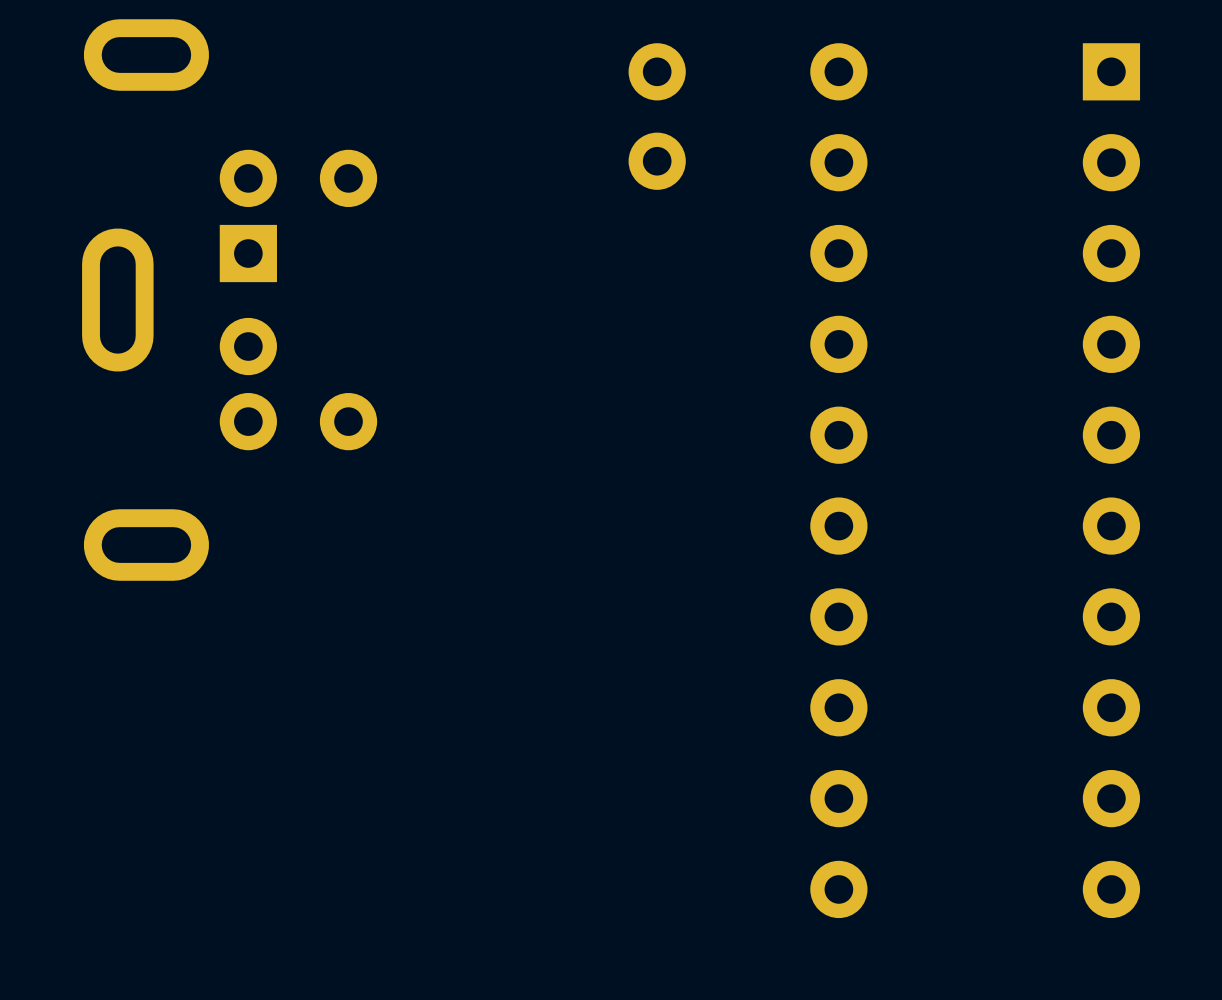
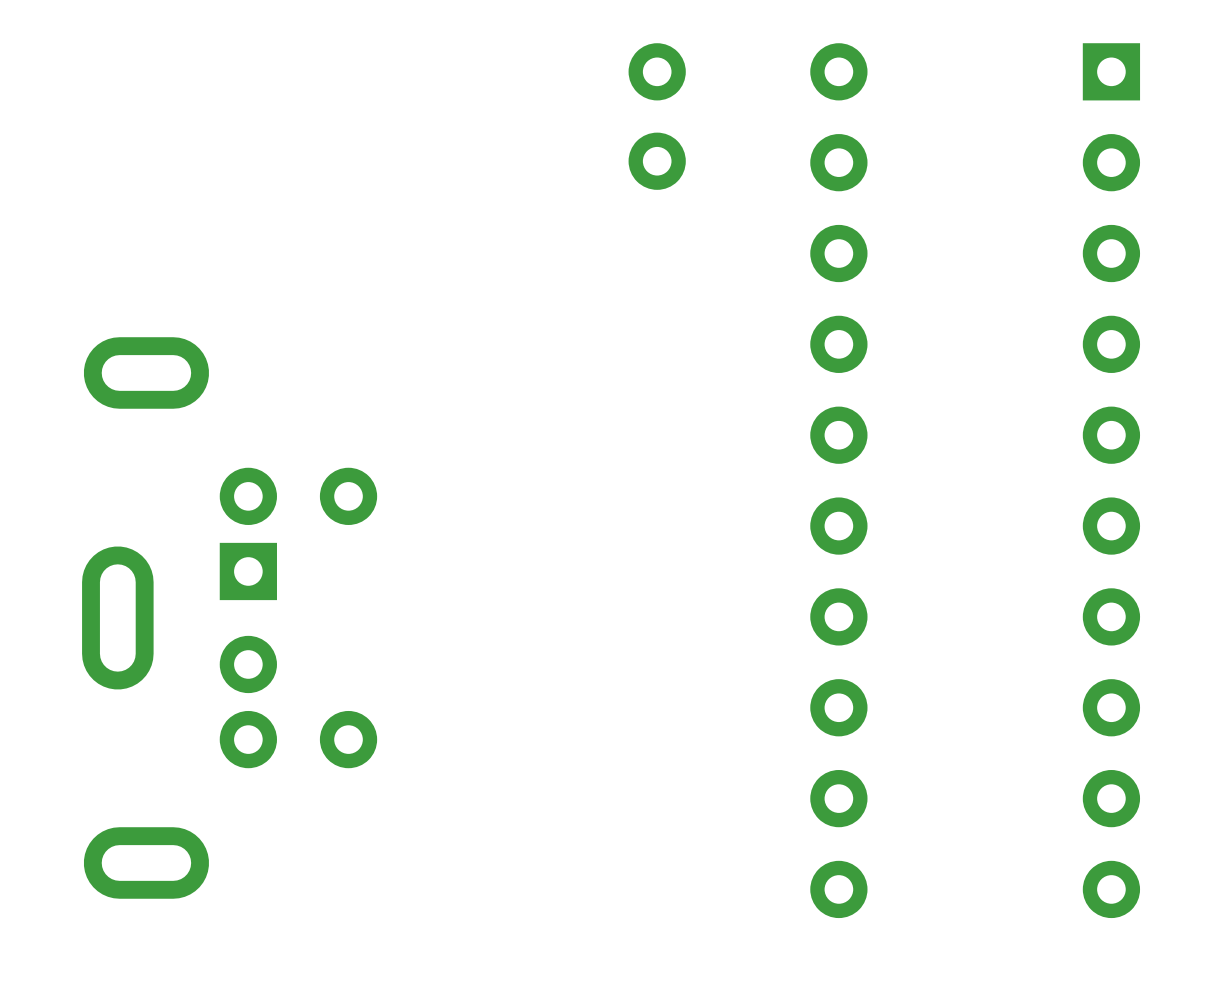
part position: (229, 300) -> (229, 617)

